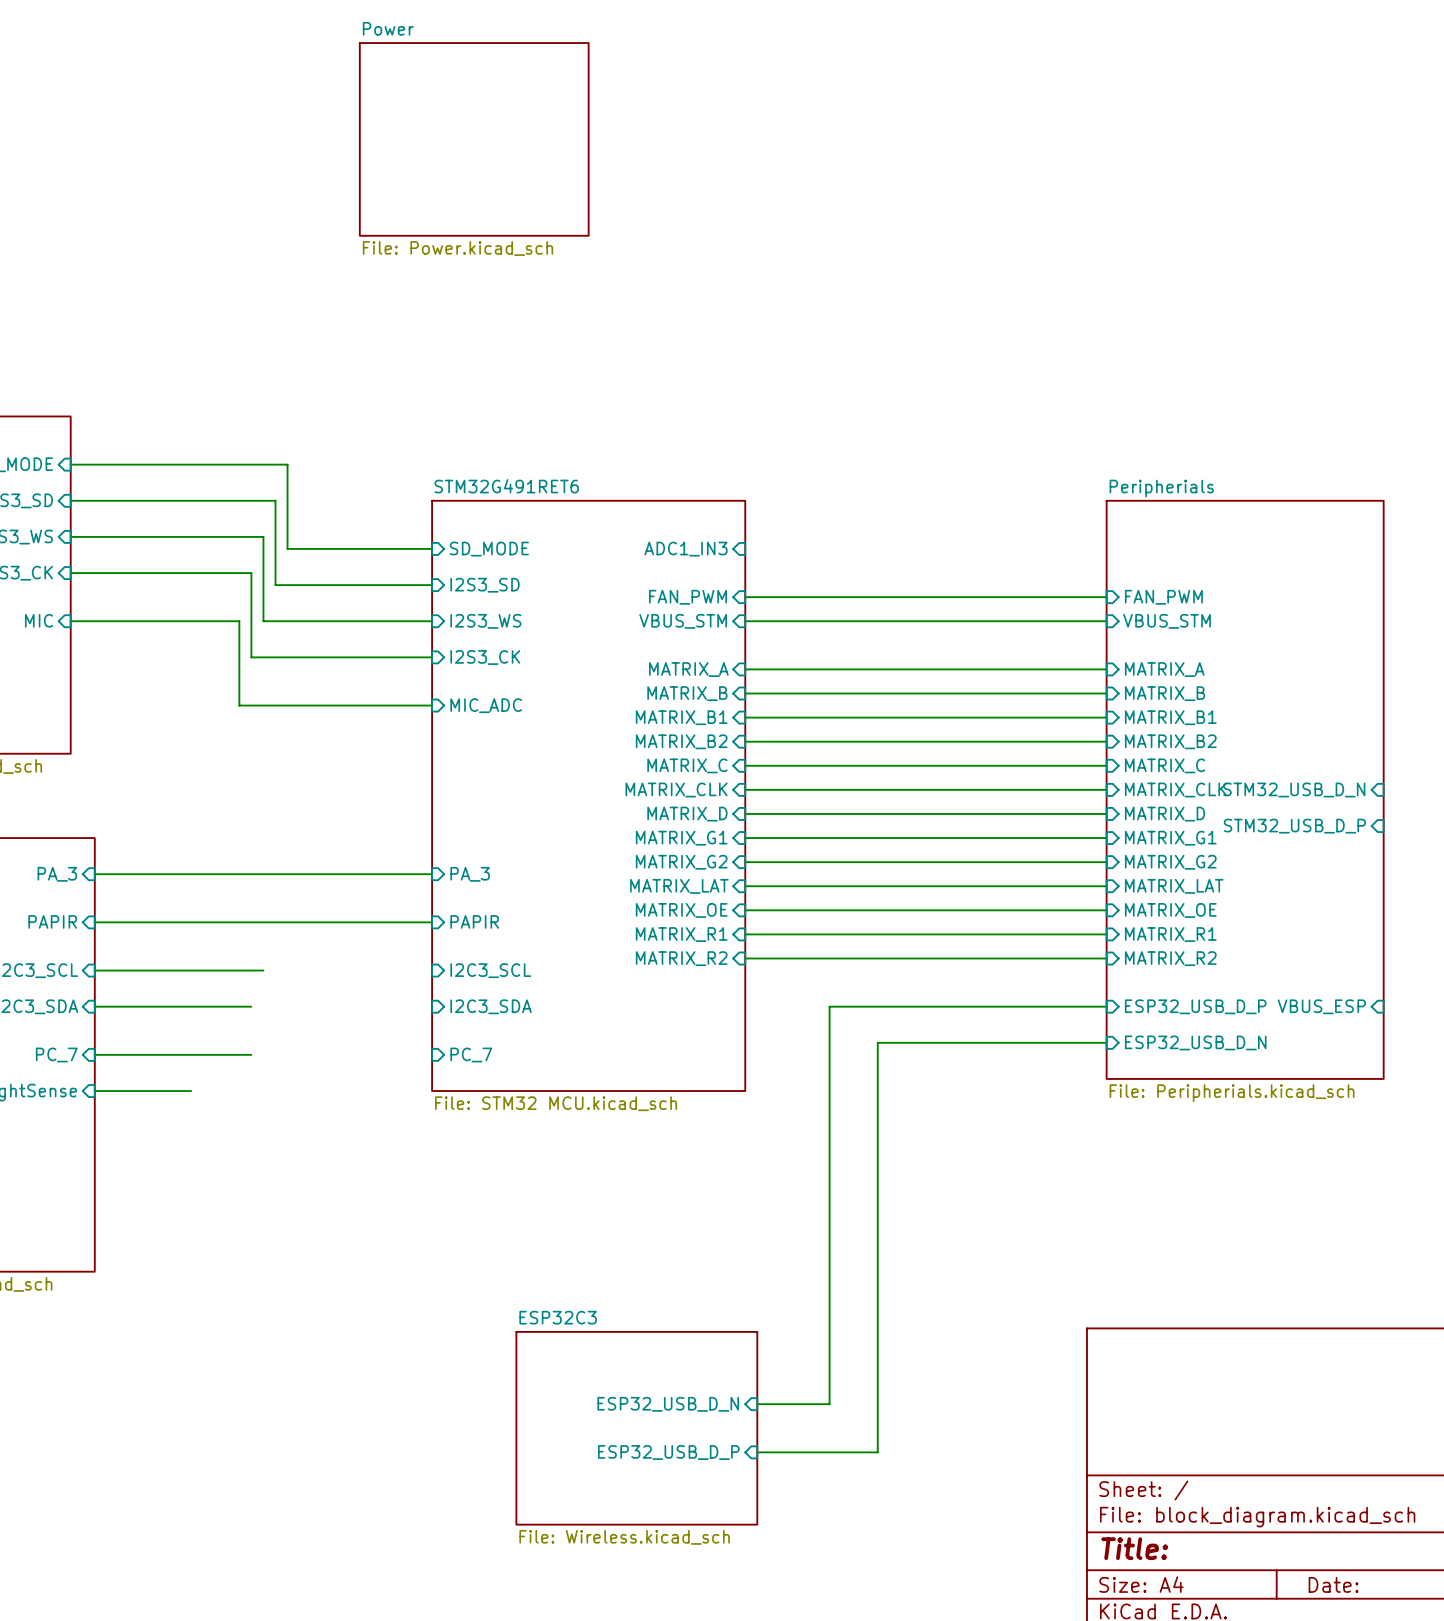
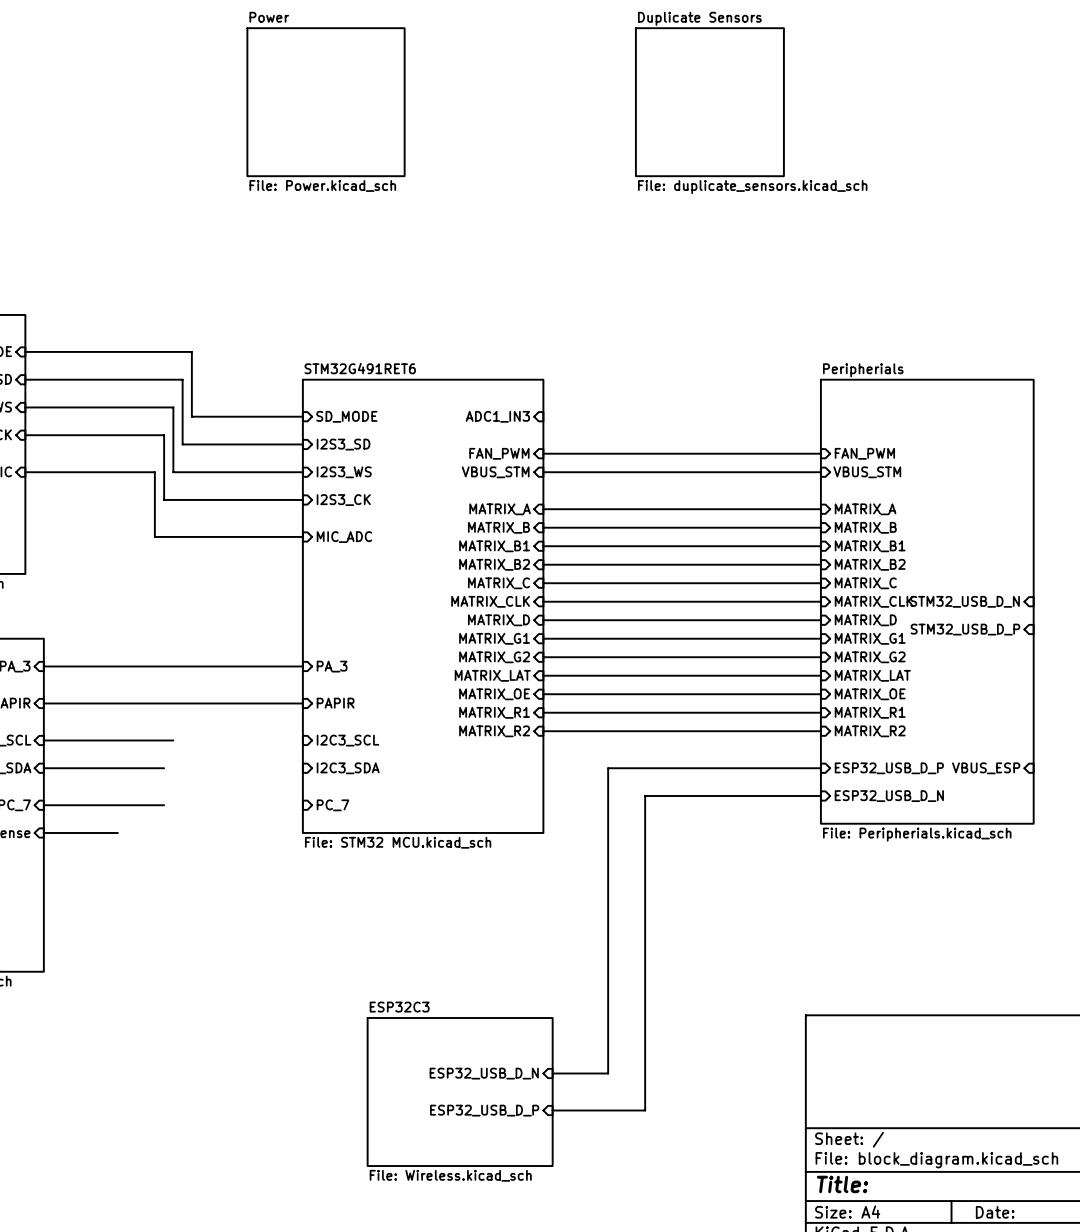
sheet Power: none -> File: Power.kicad_sch (326, 102)
sheet Power: File: Power.kicad_sch (474, 139) -> none
sheet Duplicate Sensors: none -> File: duplicate_sensors.kicad_sch (709, 102)

